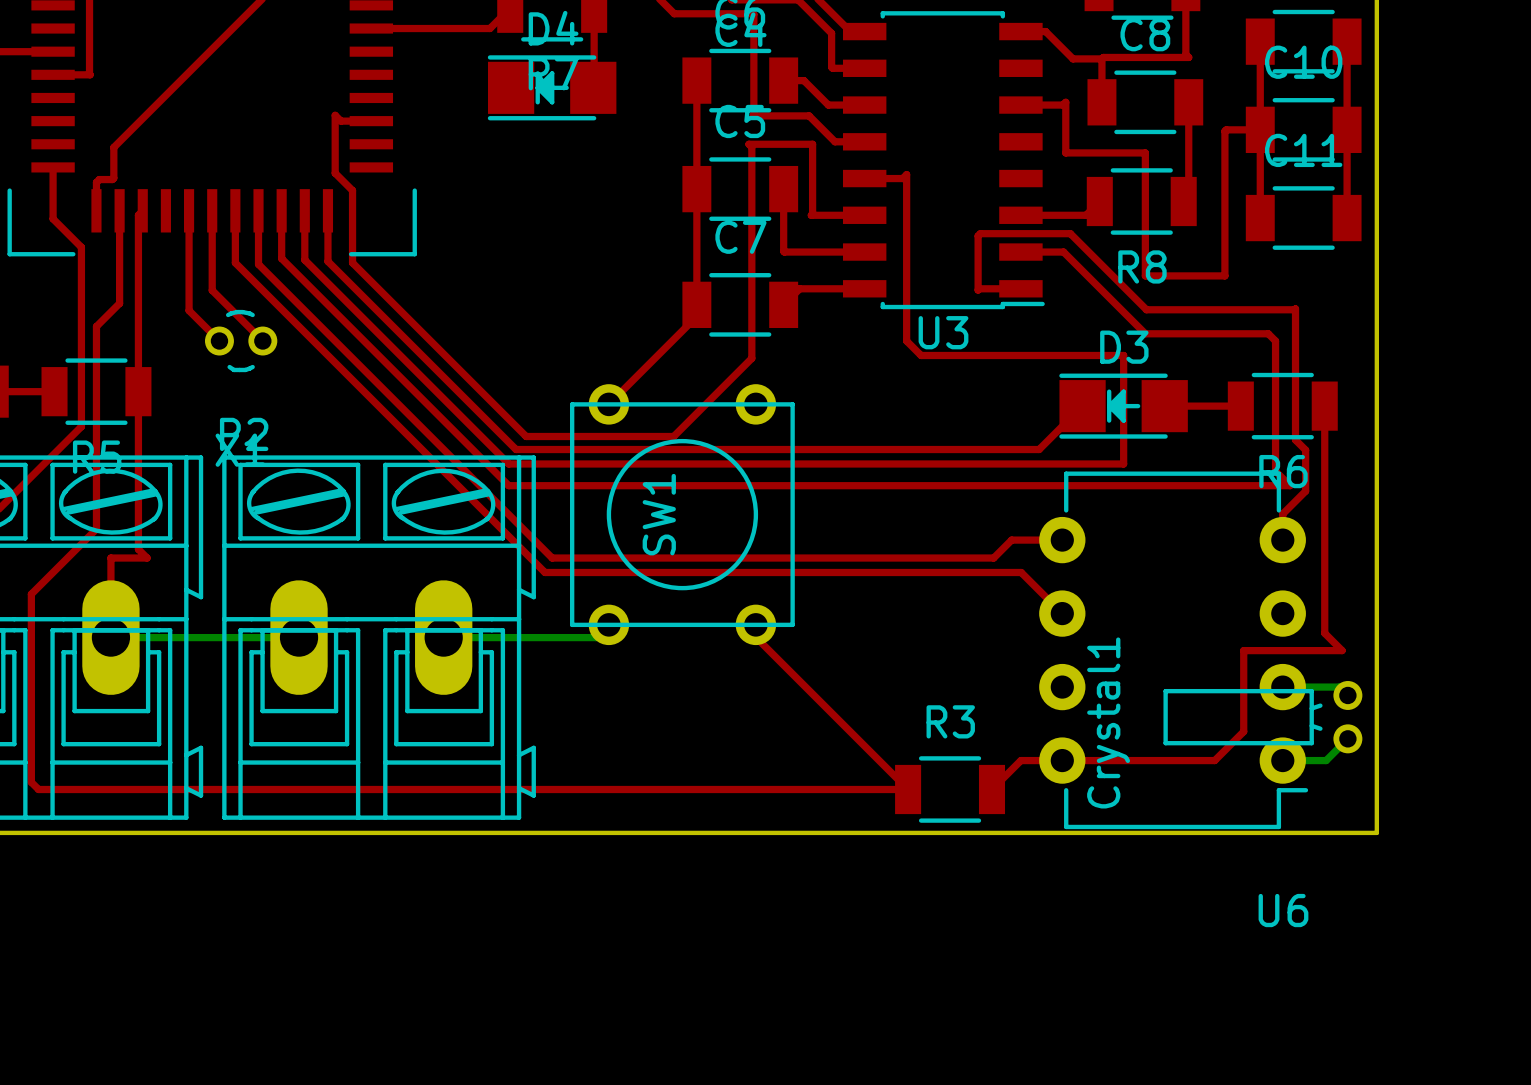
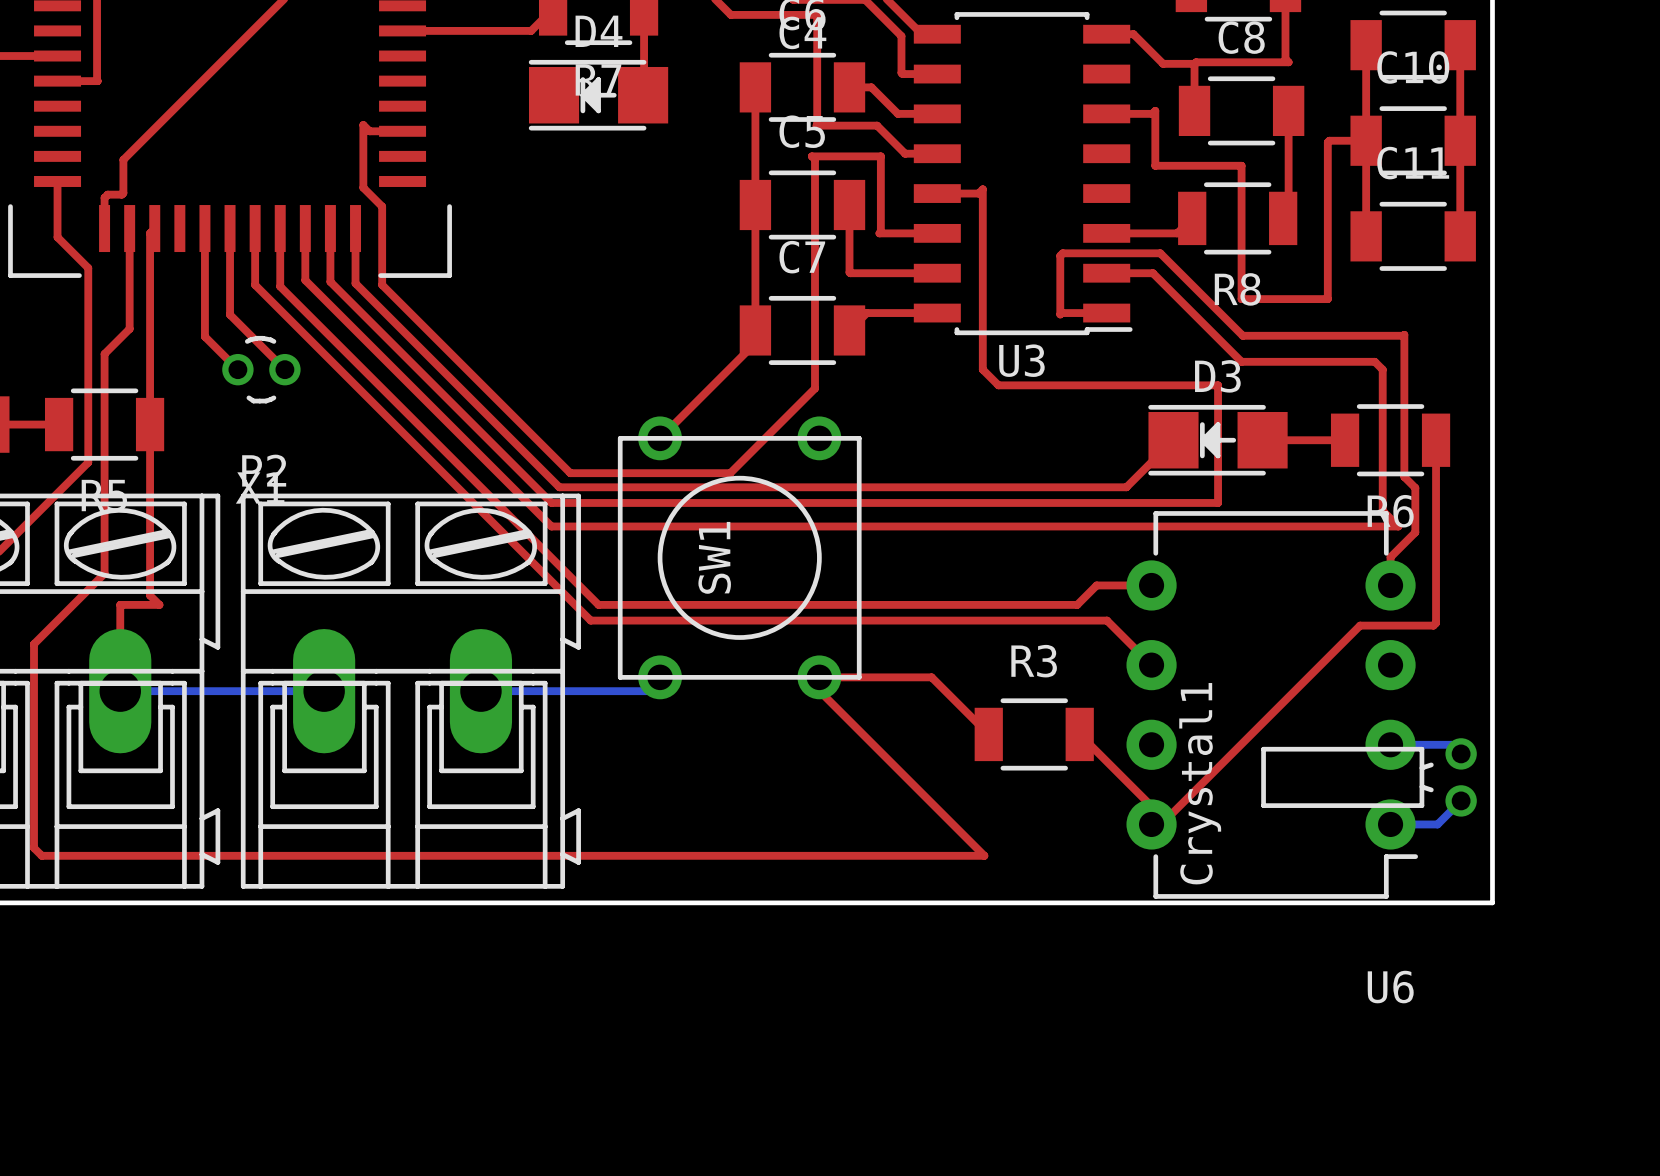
top track: (1324, 574) (1324, 633) (1342, 650) (1243, 650) (1243, 731) (1214, 760) (1073, 760) -> (1436, 623) (1433, 625) (1360, 625) (1161, 824)
top track: none -> (819, 677) (931, 677) (988, 734)
top track: (1062, 760) (1020, 760) (992, 789) -> (1151, 824) (1151, 806) (1079, 734)
R3 position: (950, 789) -> (1034, 734)

